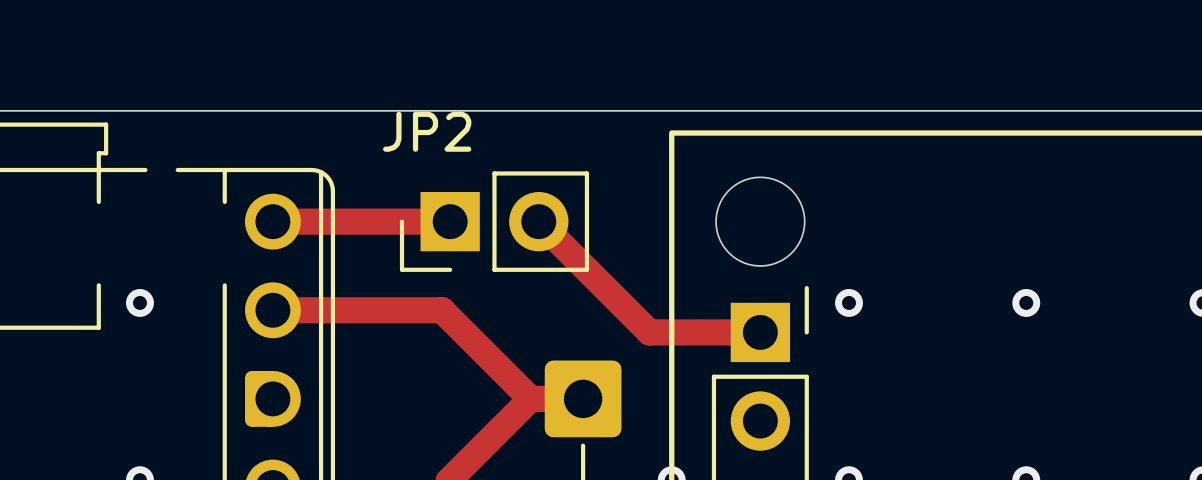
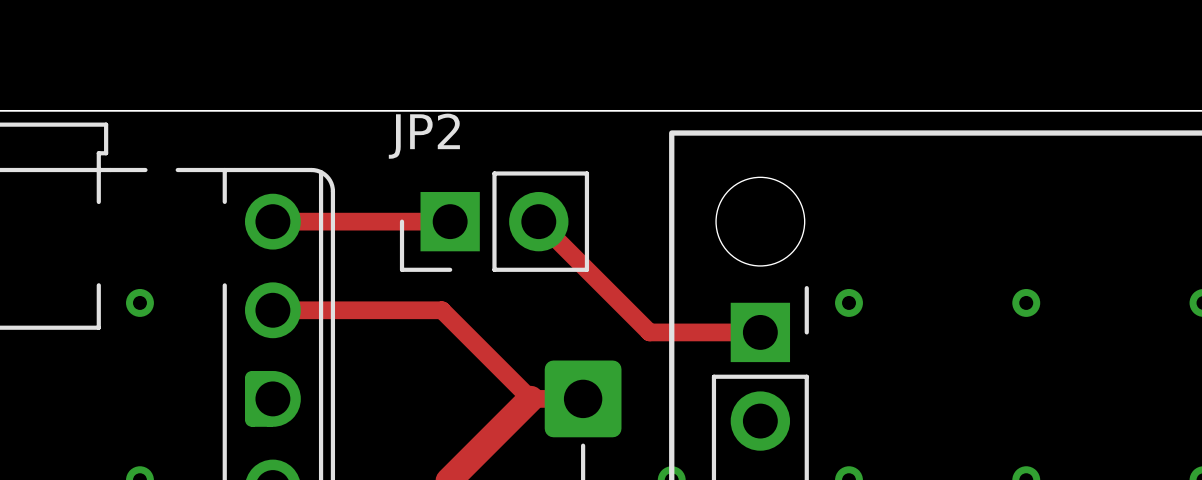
track width: thick (272, 221) (450, 221) -> thin (272, 221) (450, 221)
track width: thick (538, 221) (649, 332) (760, 332) -> thin (538, 221) (649, 332) (760, 332)
track width: thick (272, 310) (442, 310) (530, 398) (583, 398) -> thin (272, 310) (442, 310) (530, 398) (583, 398)

